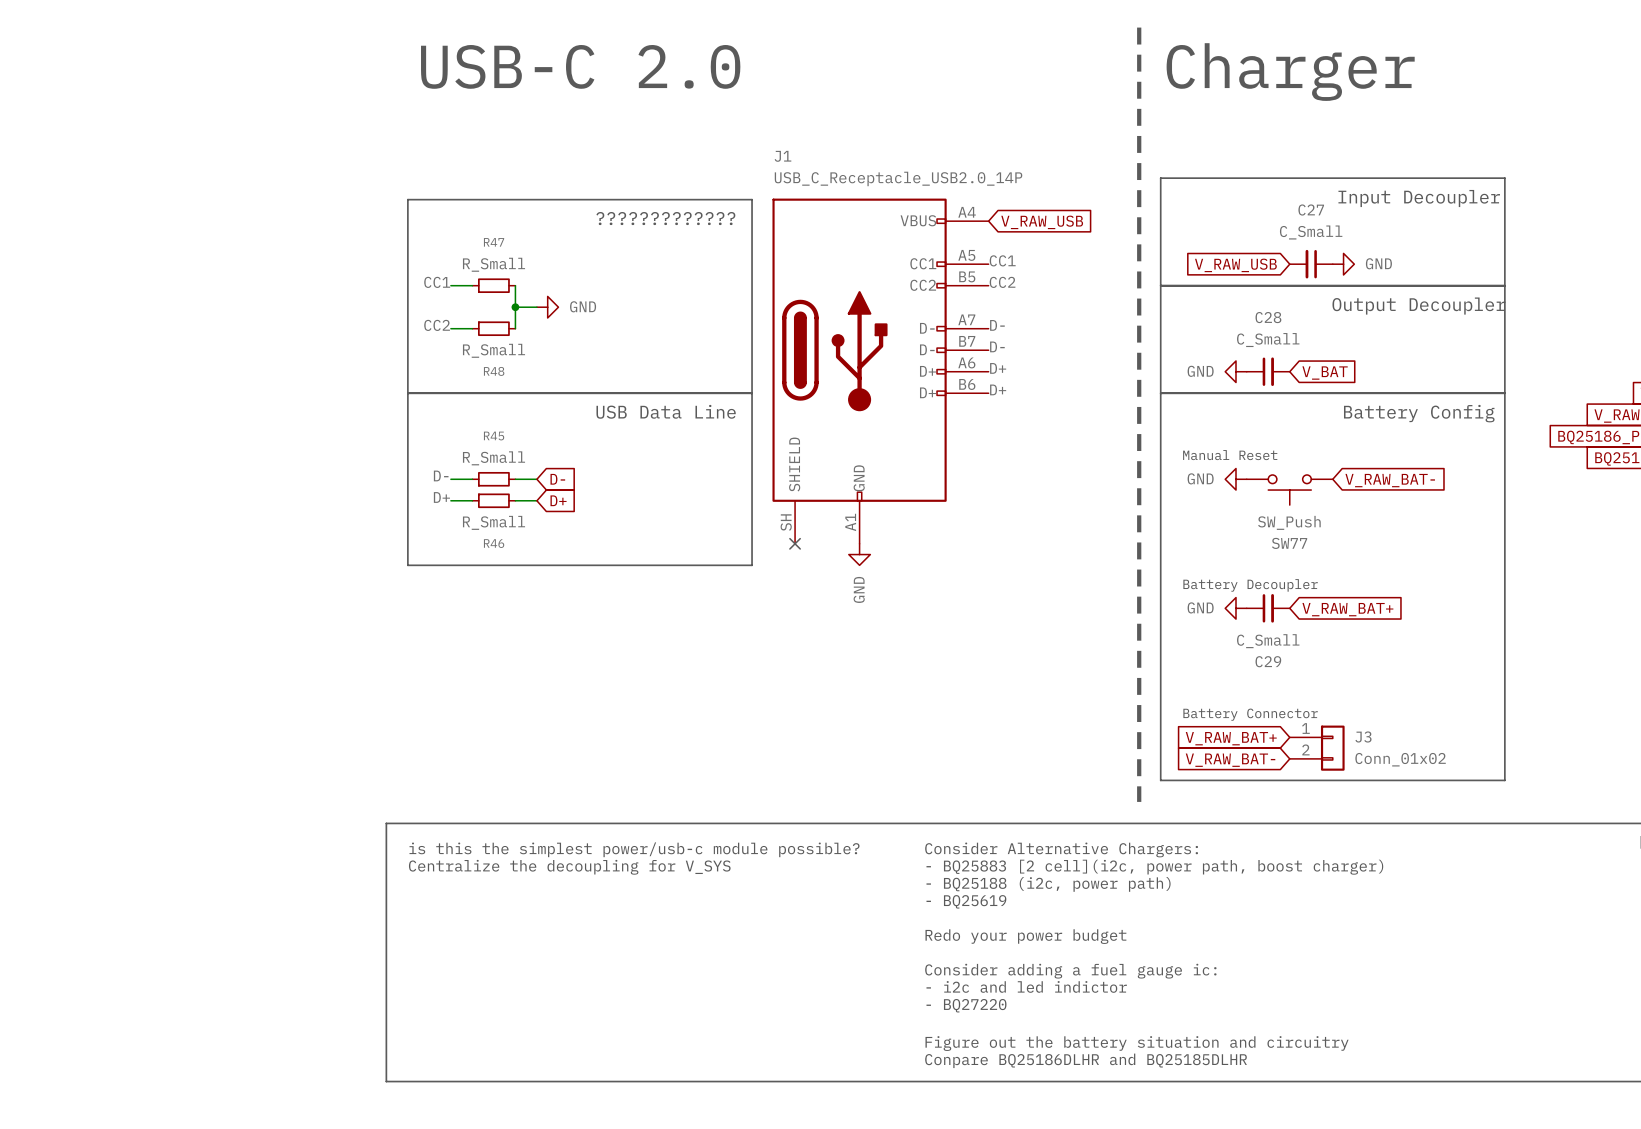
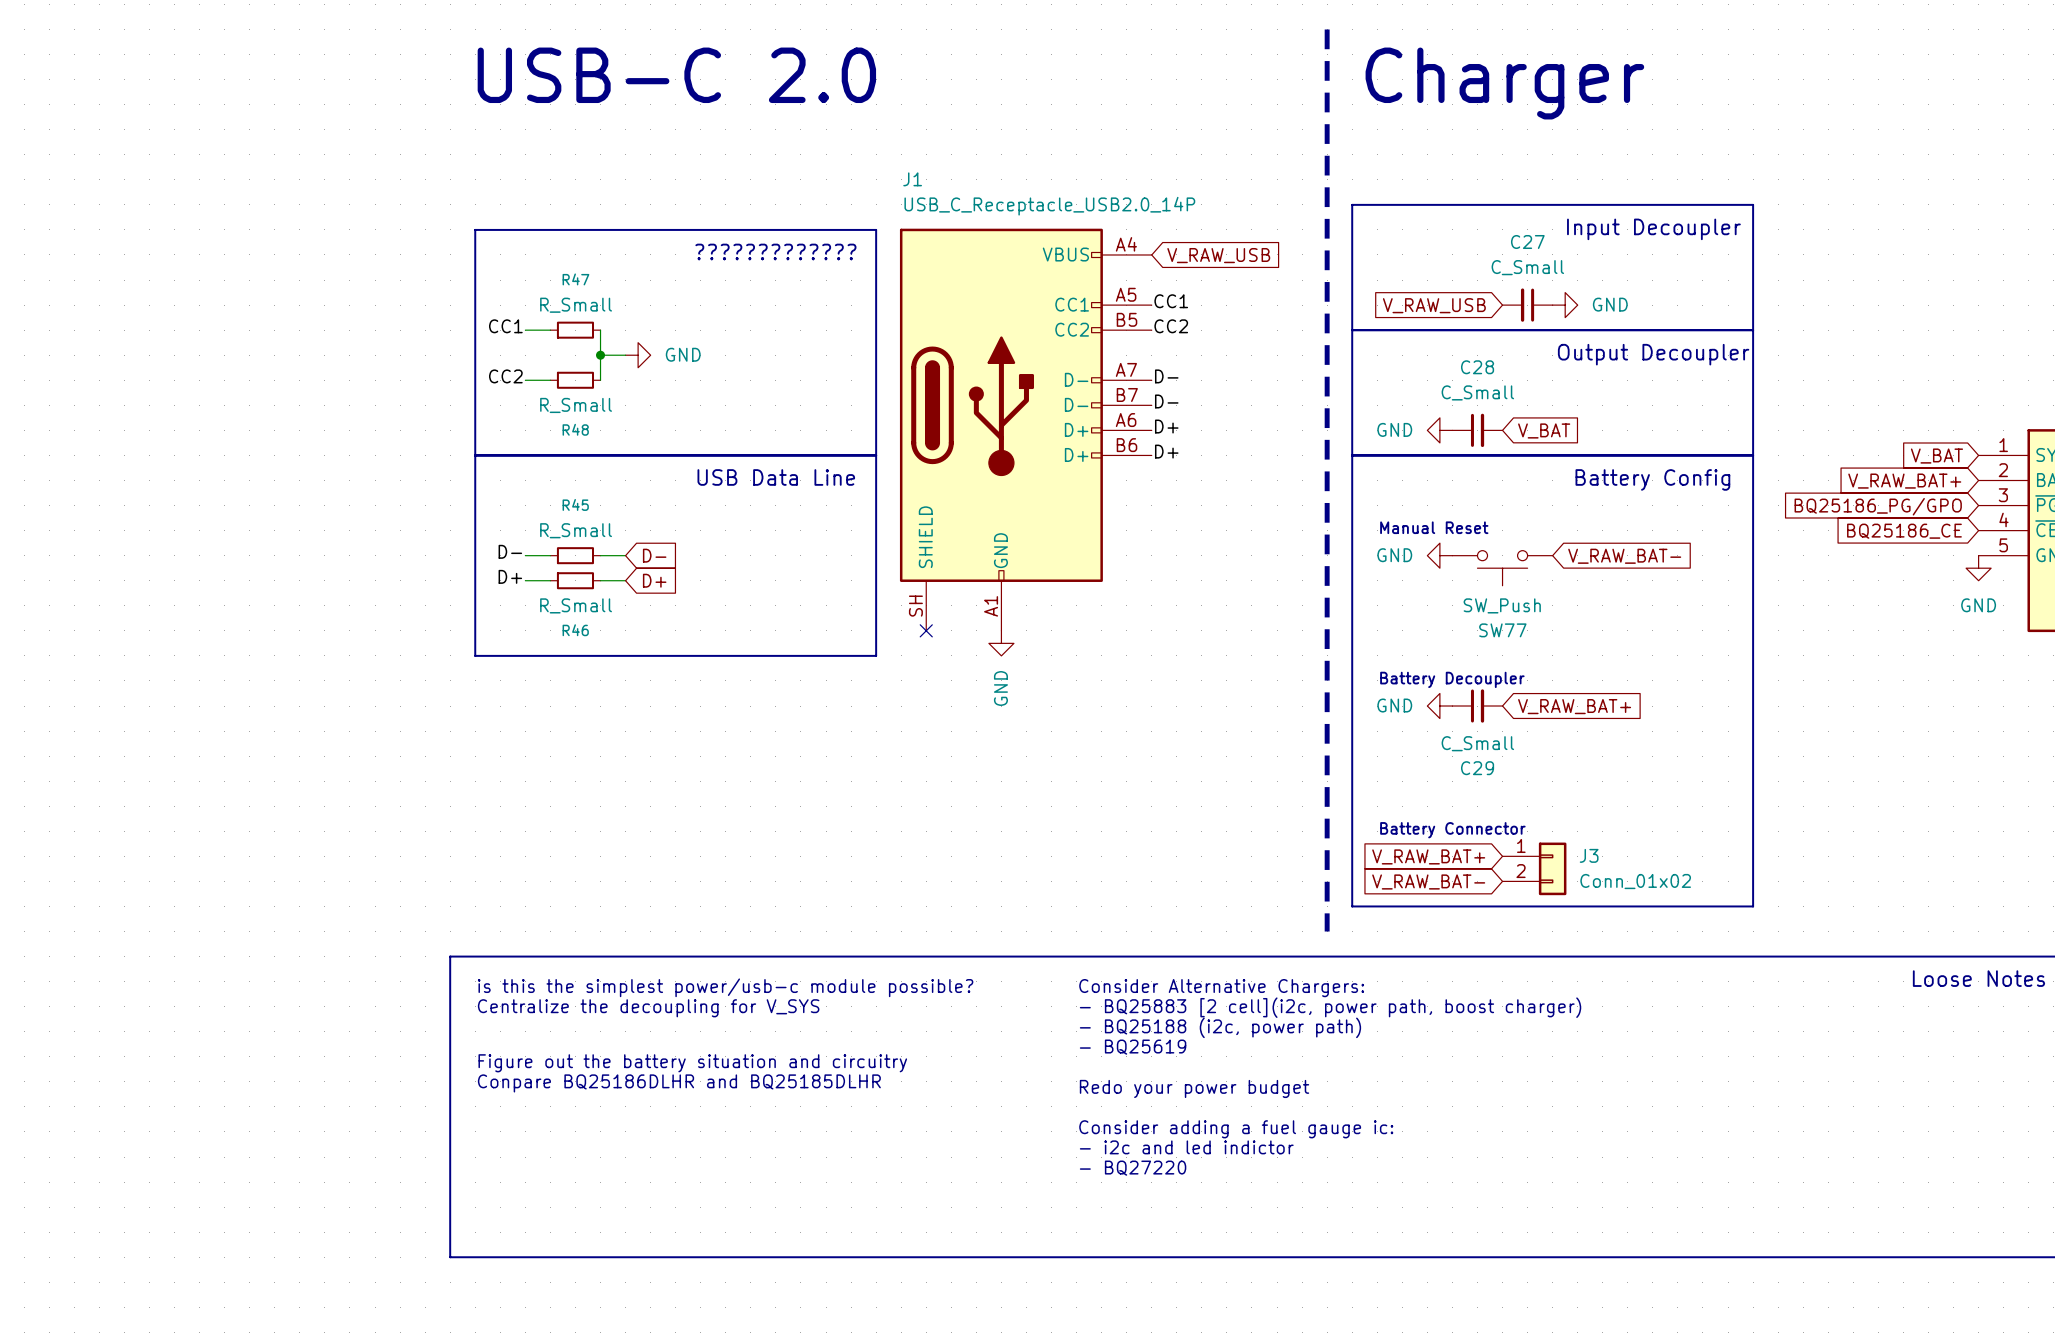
text: none -> Figure out the battery situation and circuitry (692, 1063)
text: none -> Conpare BQ25186DLHR and BQ25185DLHR (679, 1083)
text: Figure out the battery situation and circuitry (1137, 1043) -> none
text: Conpare BQ25186DLHR and BQ25185DLHR (1086, 1060) -> none

